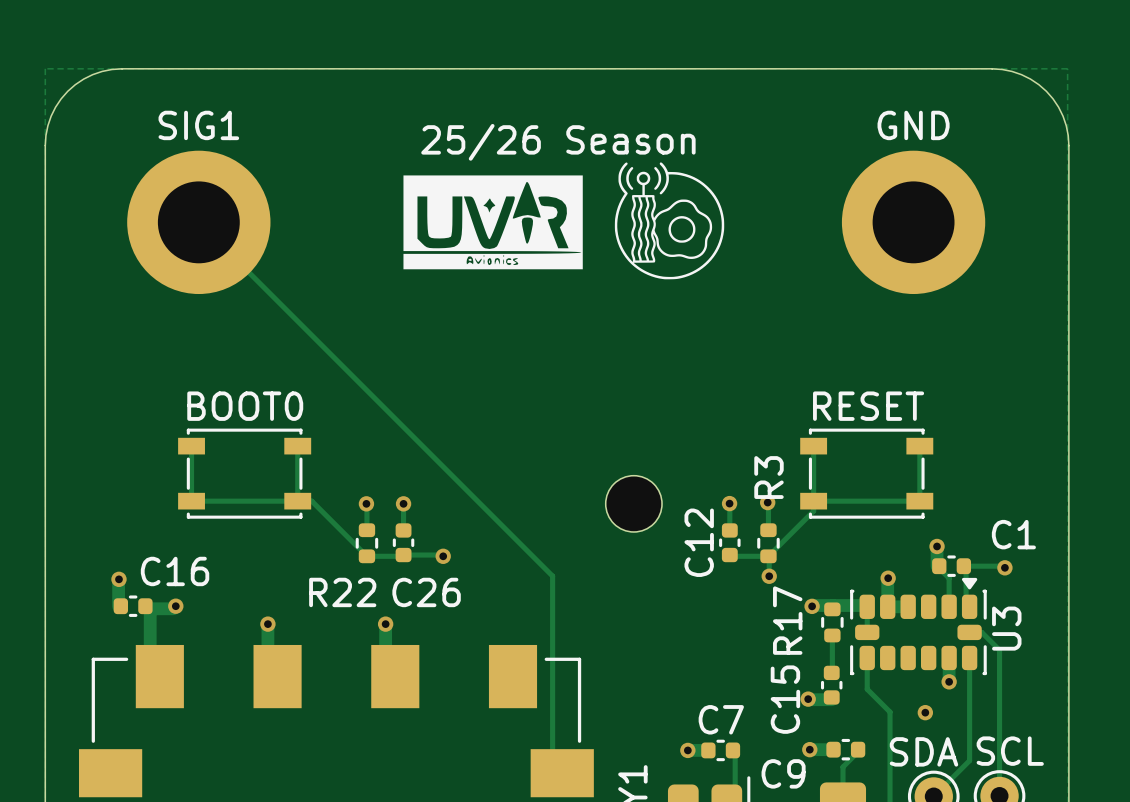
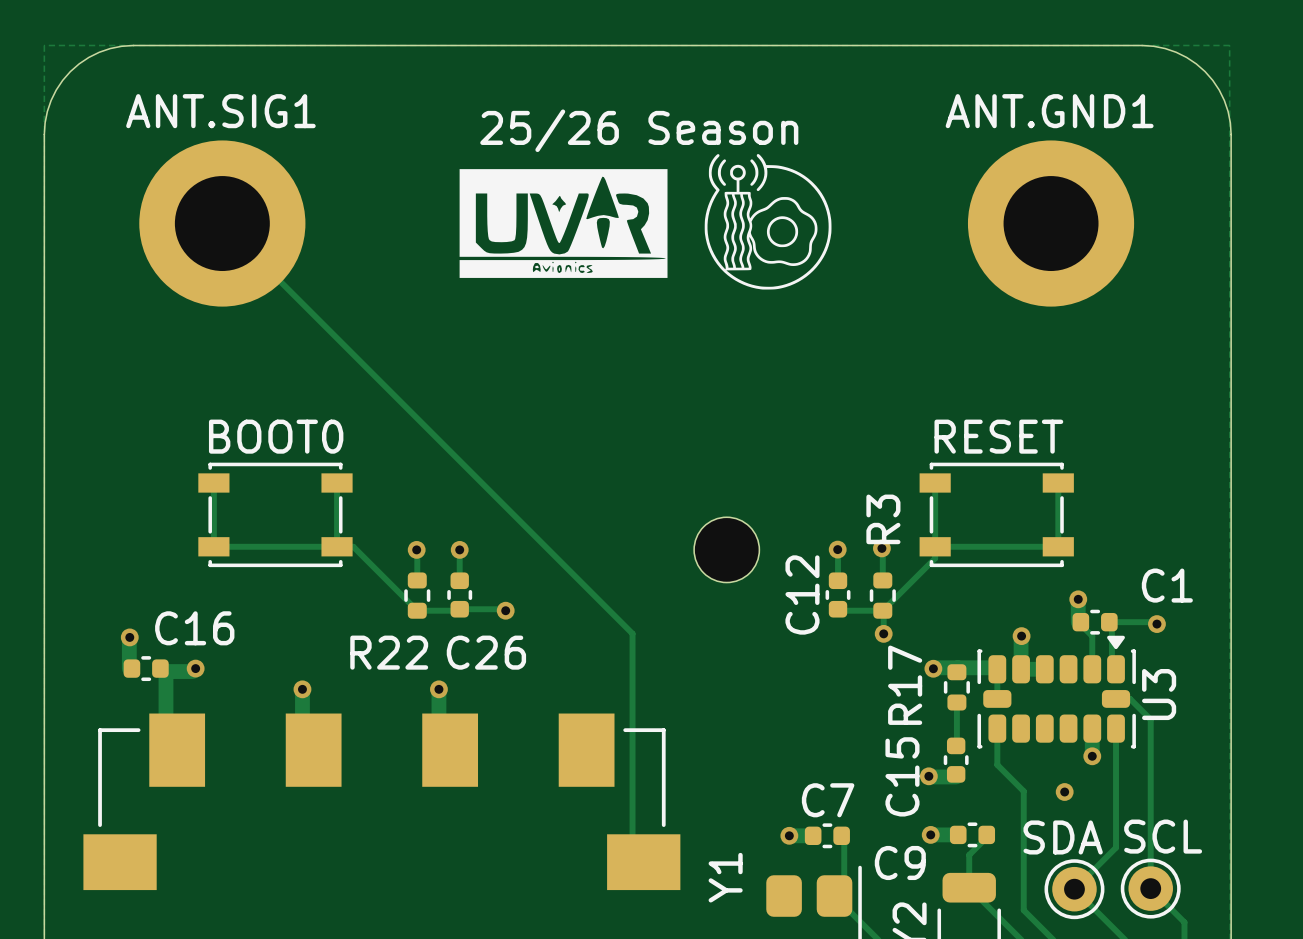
SIG1 name: SIG1 (198, 125) -> ANT.SIG1 (220, 111)
GND name: GND (913, 125) -> ANT.GND1 (1049, 111)

